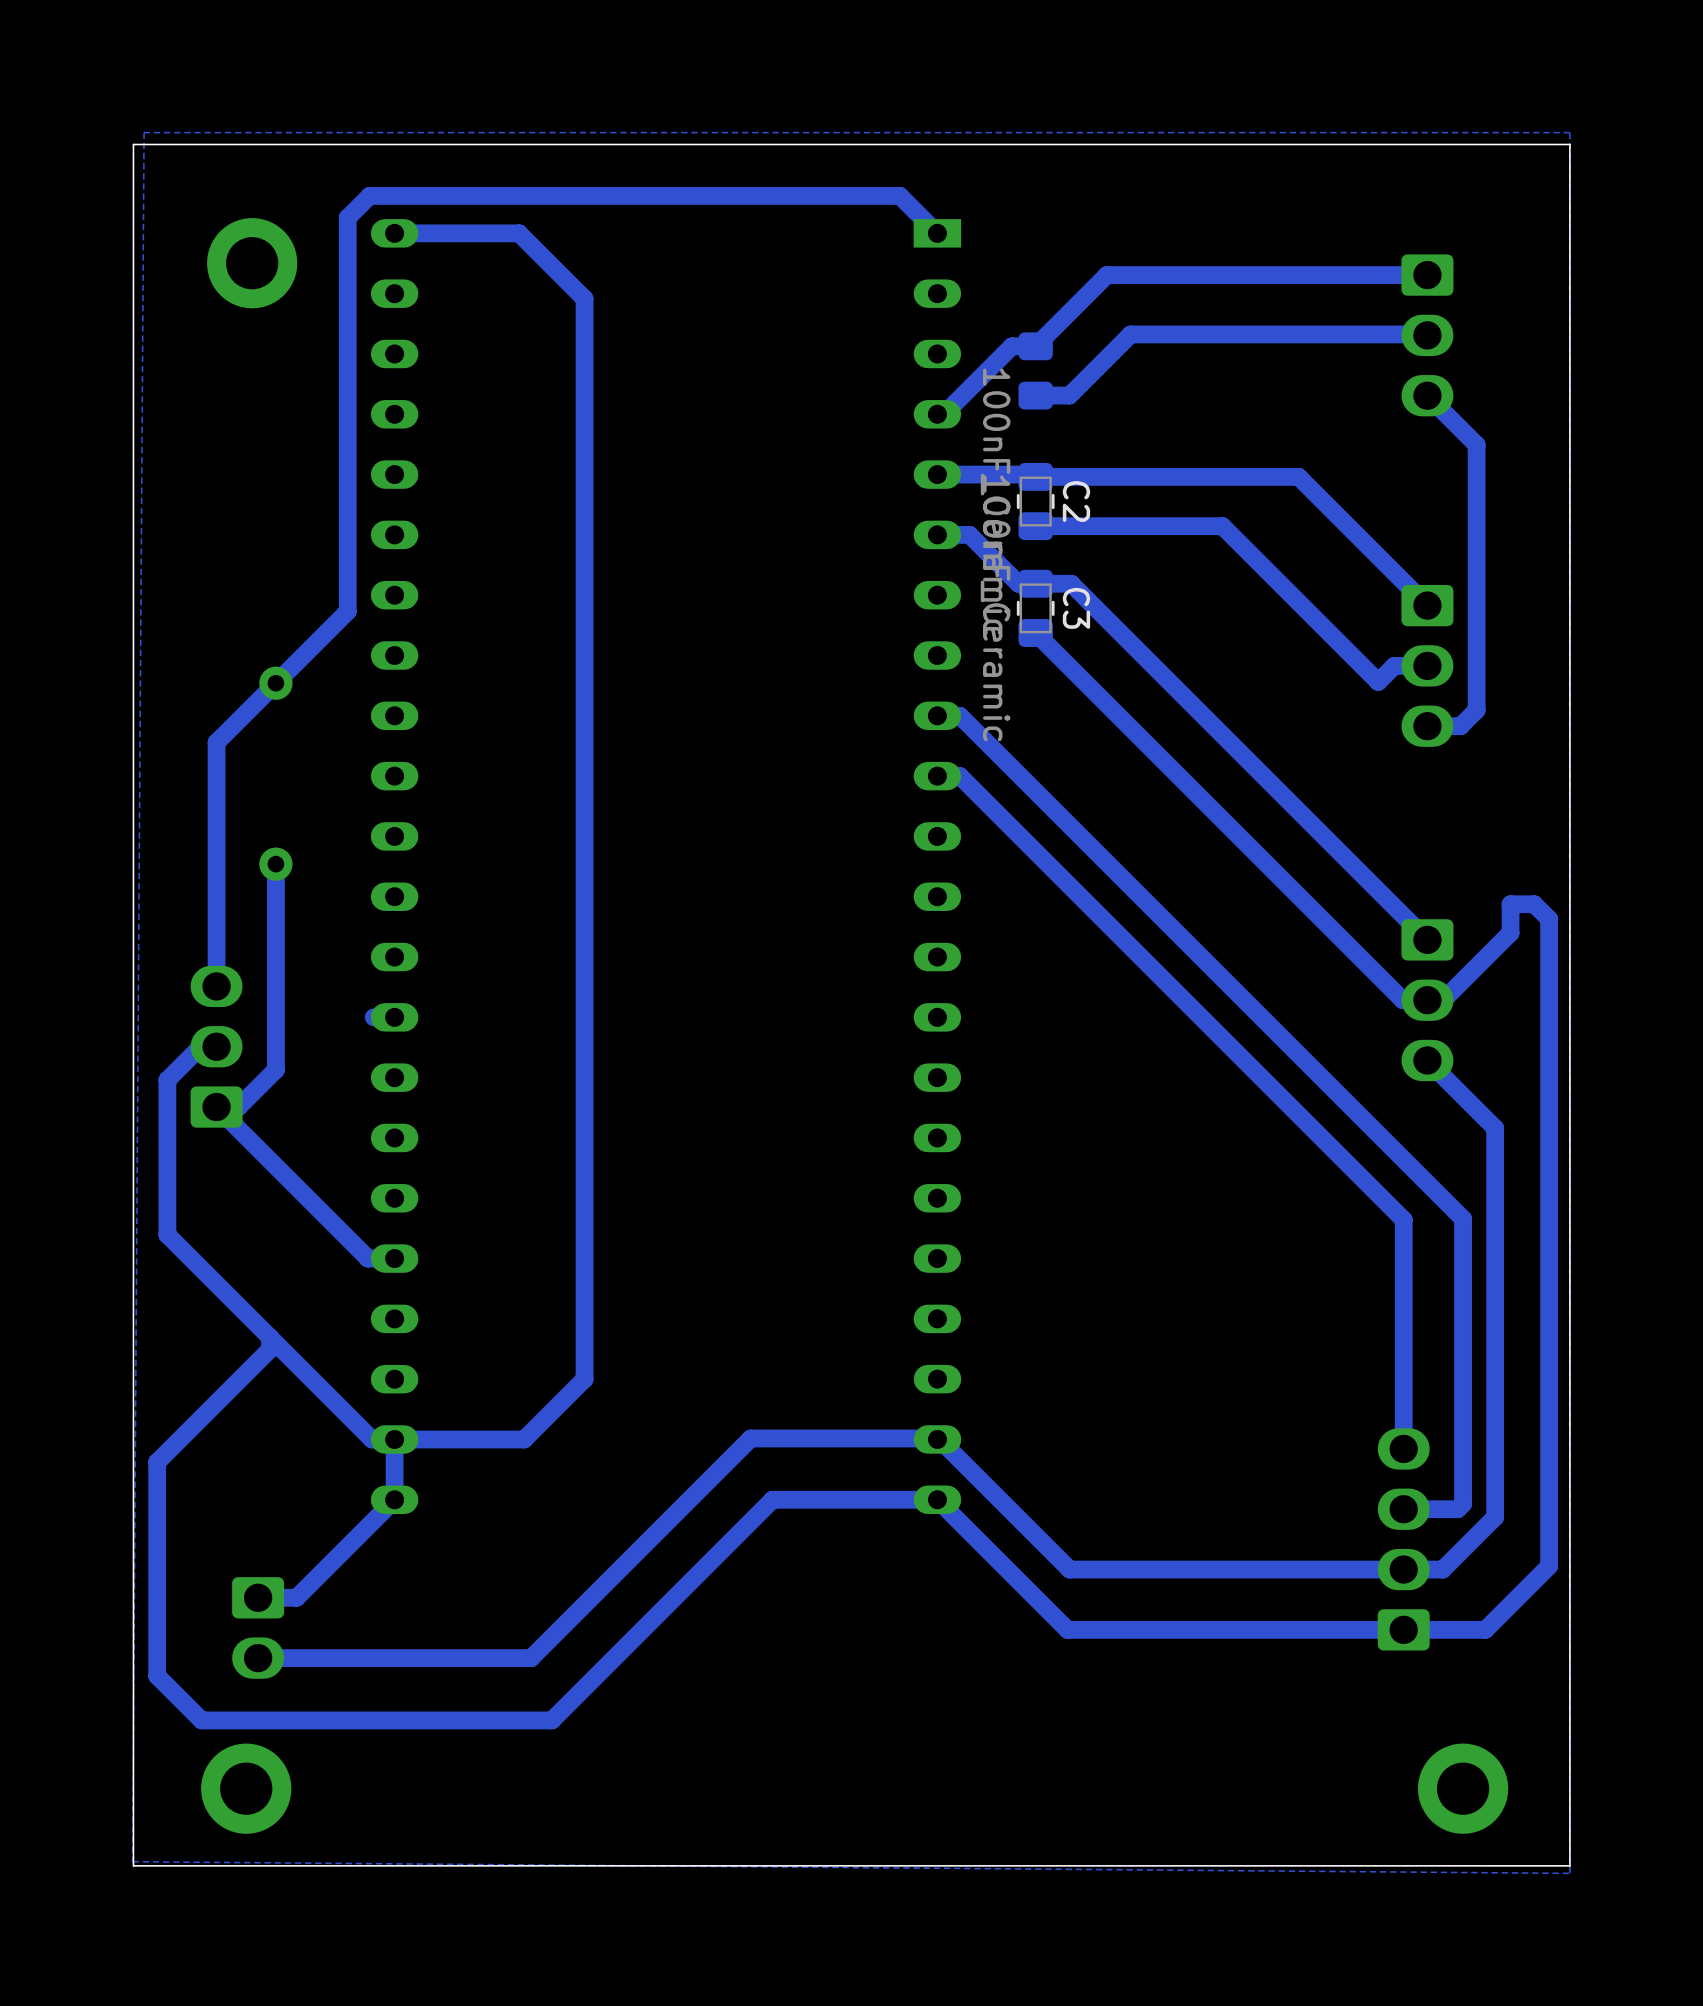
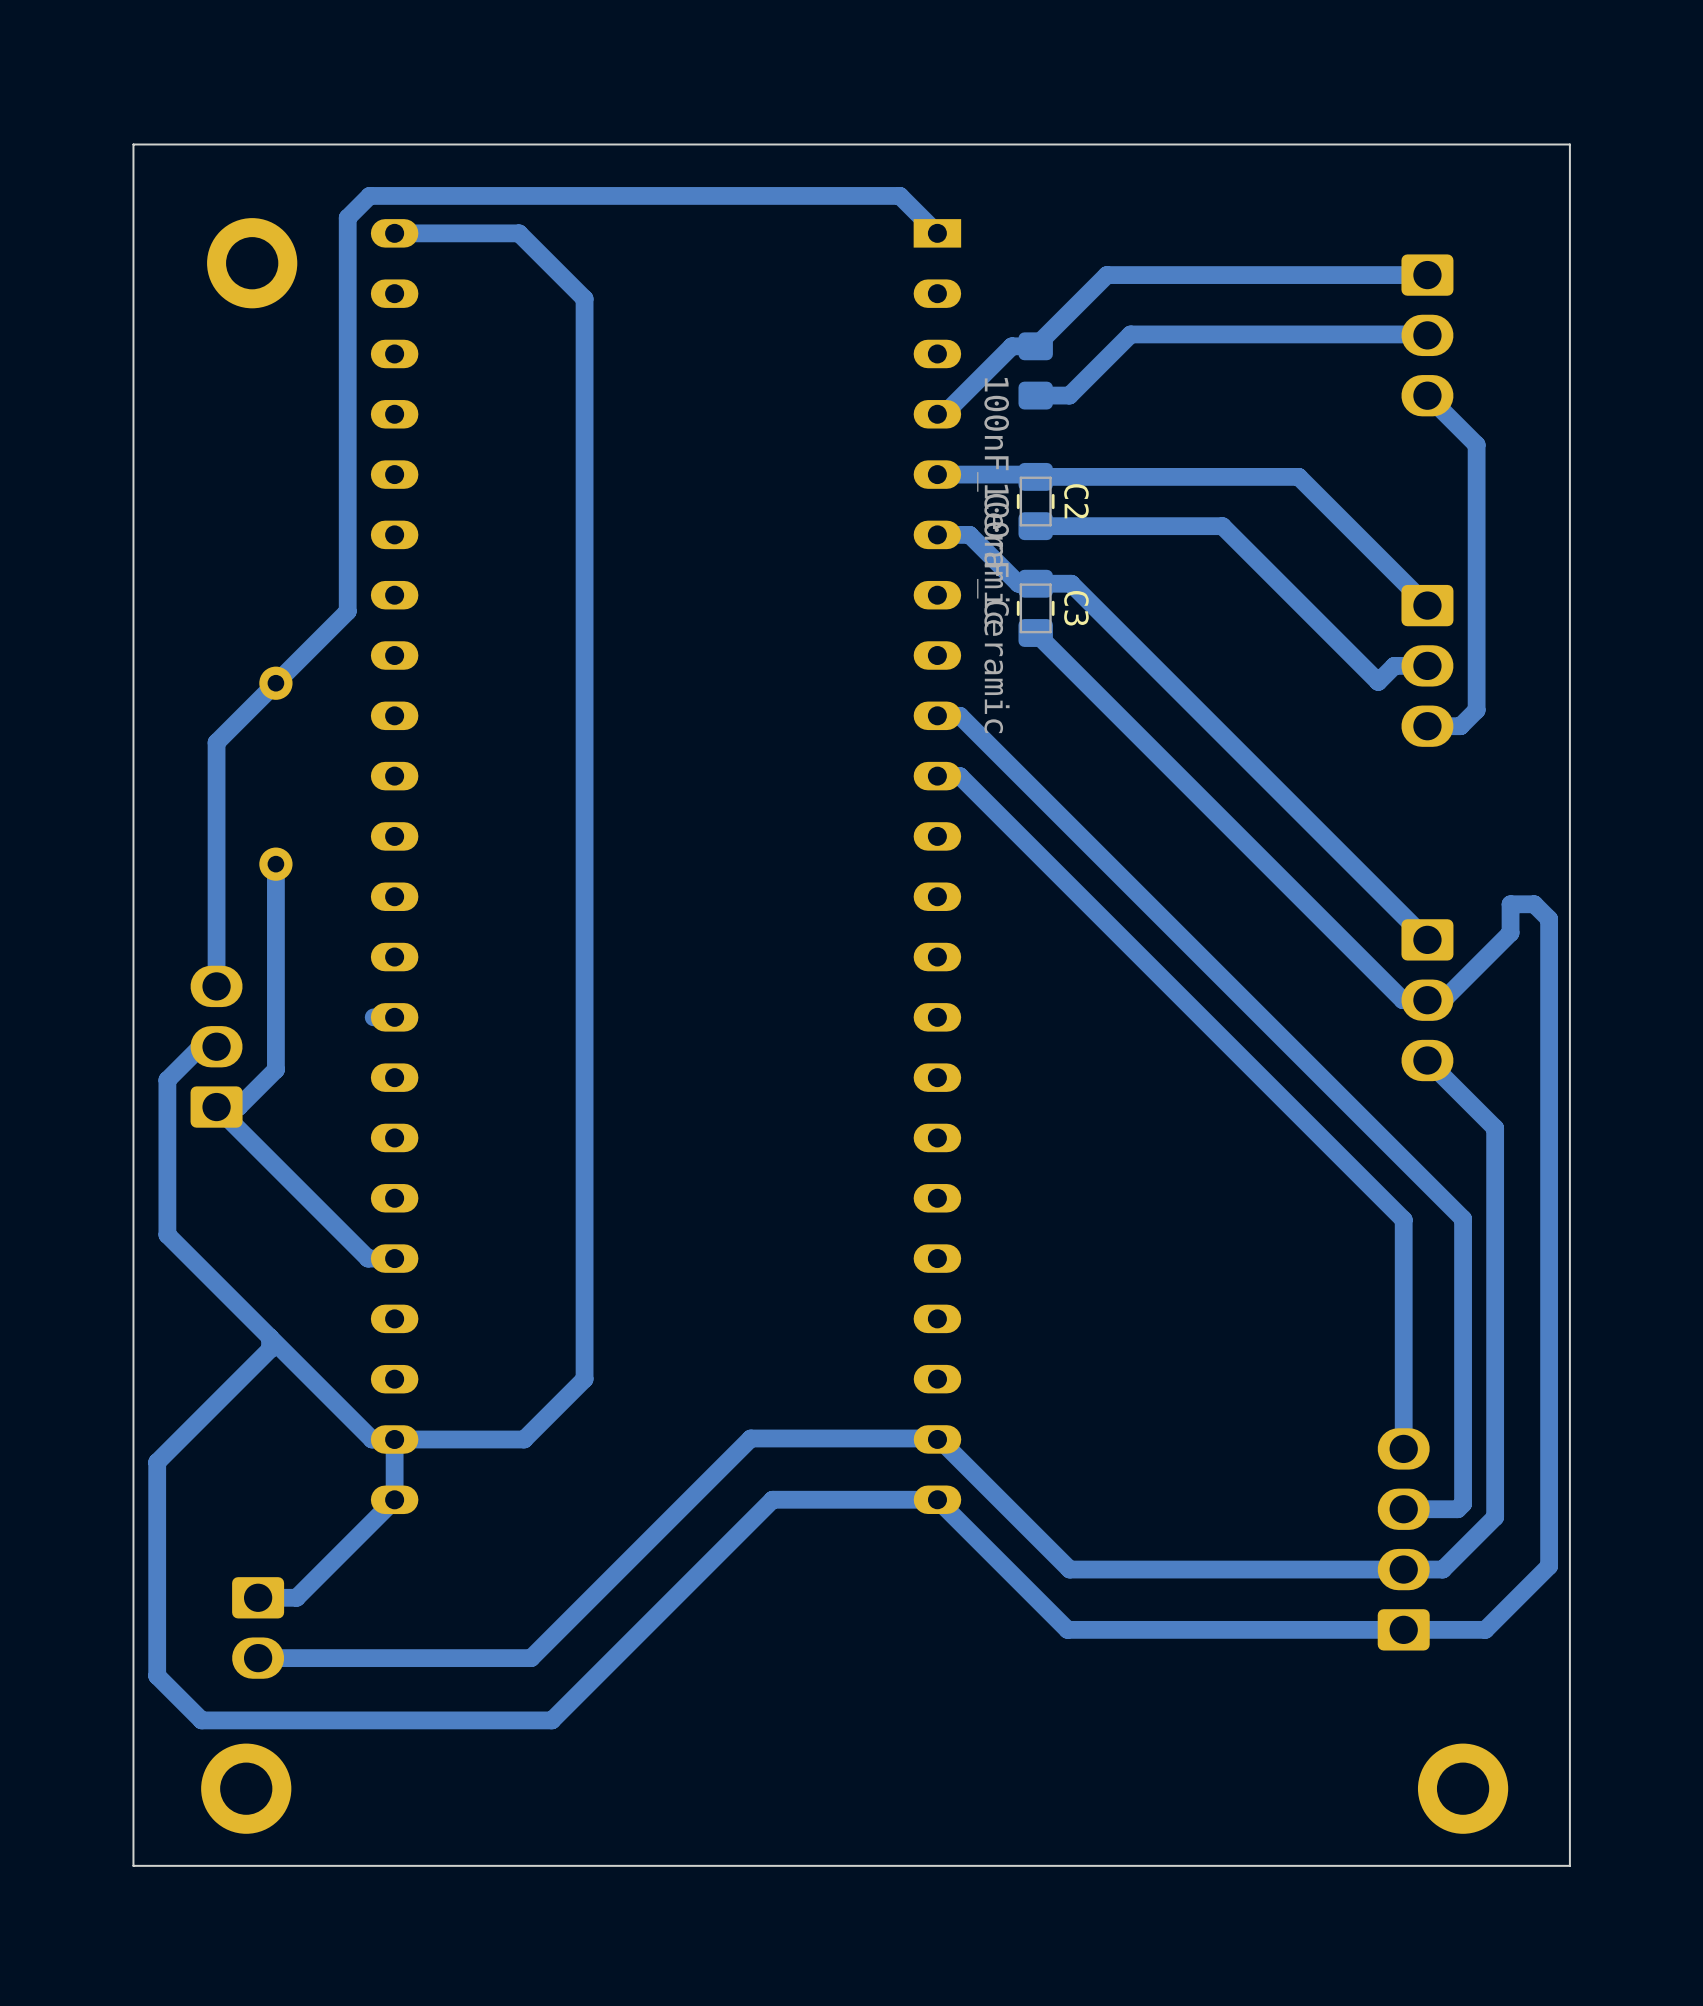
zone outline: (1569, 132) (144, 132) (132, 1861) (1569, 1873) (1569, 132) -> none

